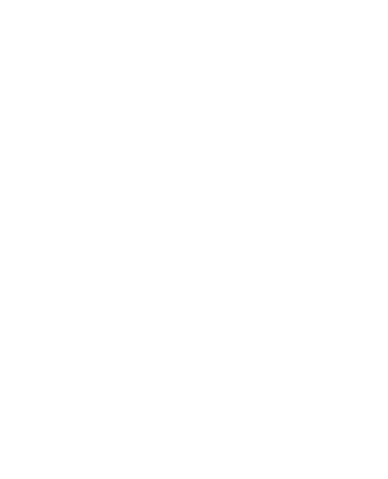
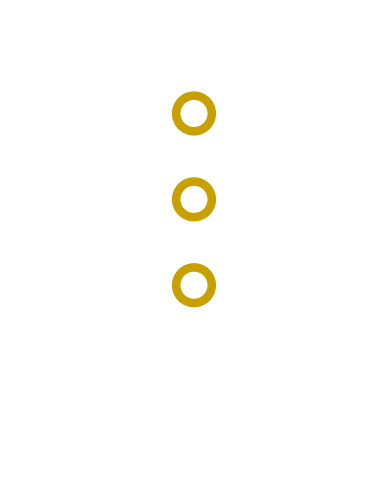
part: none -> (193, 199)

